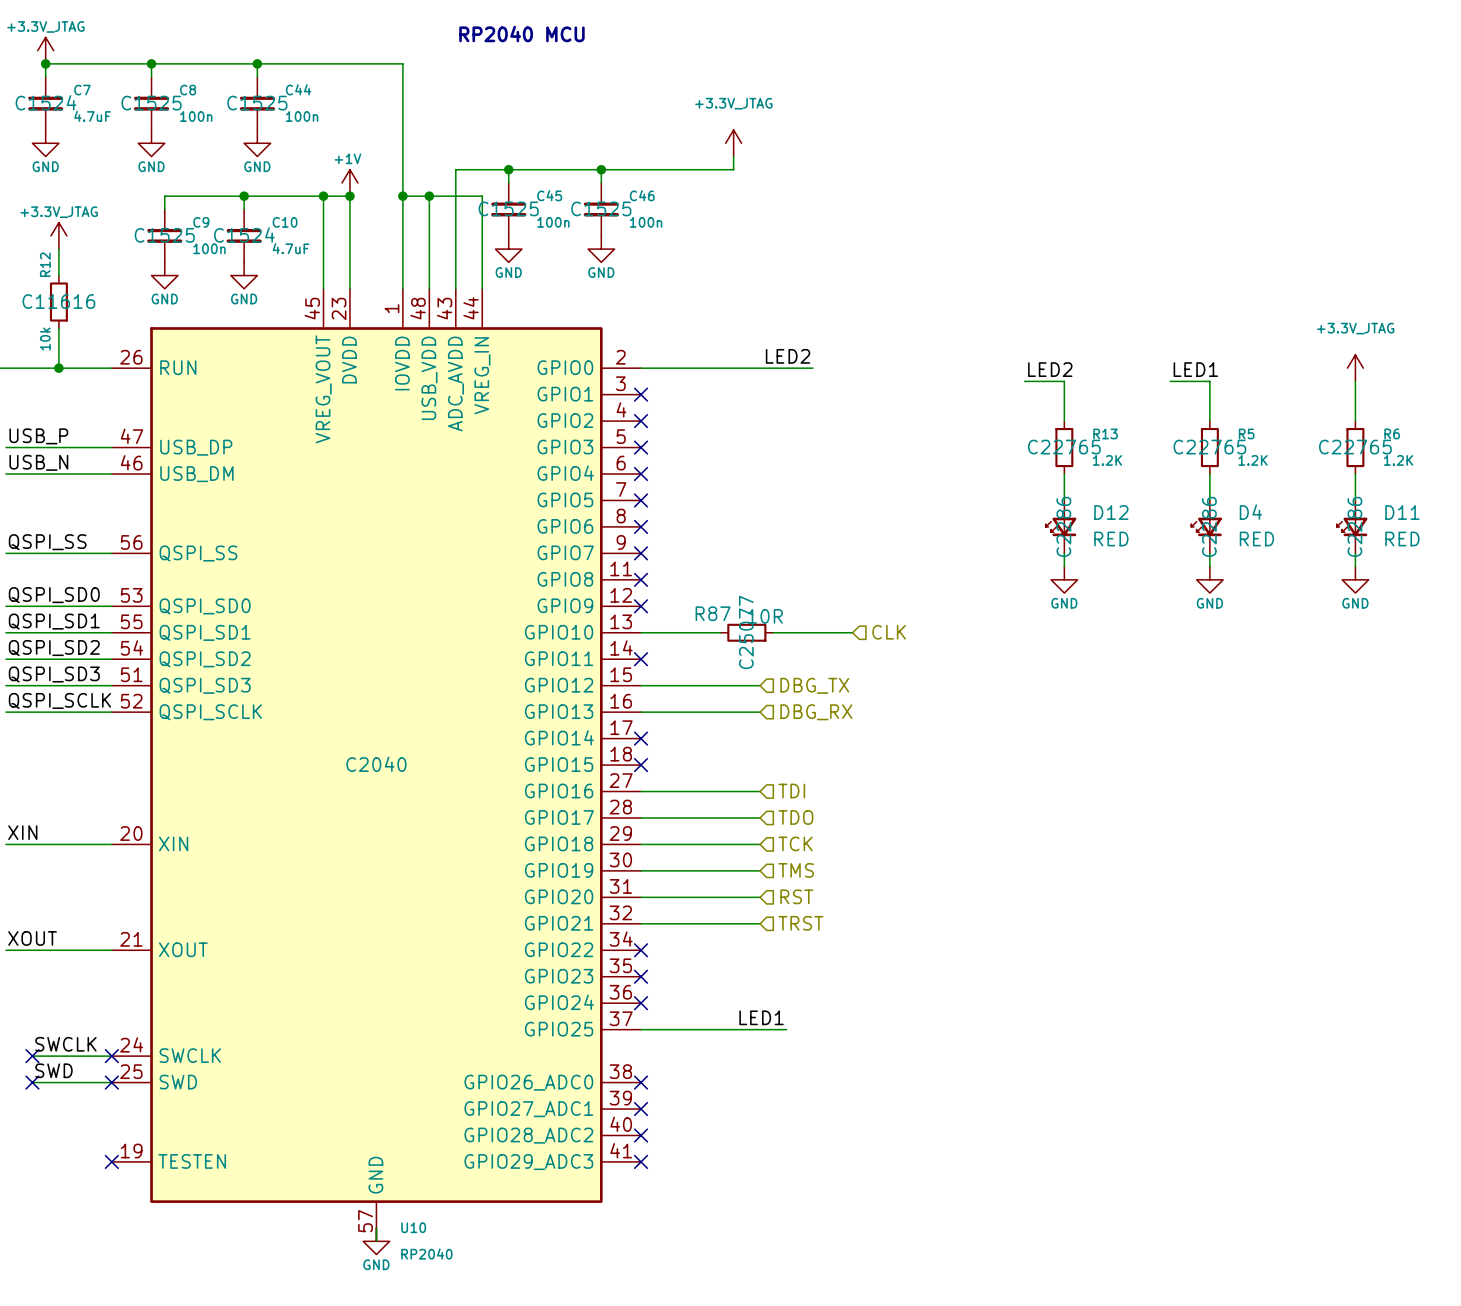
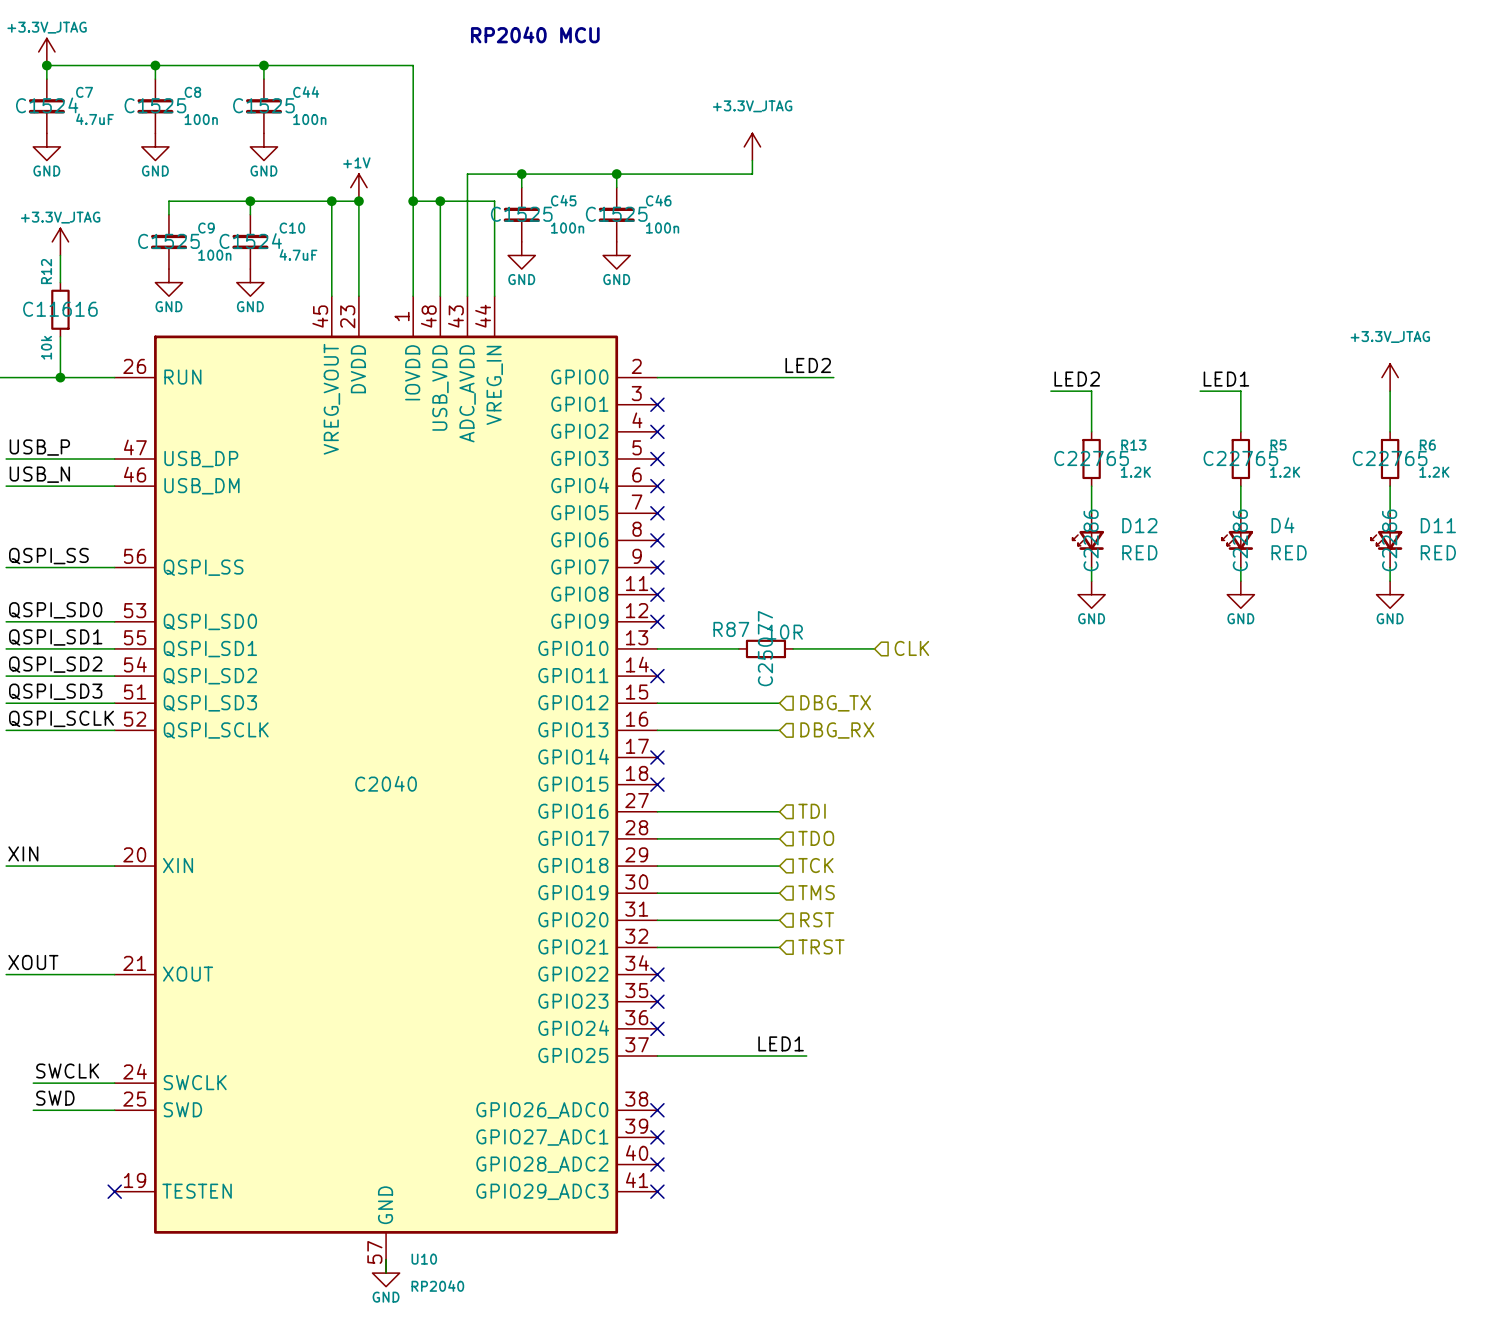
no-connect mark: (32, 1056) -> none
no-connect mark: (111, 1056) -> none
no-connect mark: (32, 1082) -> none
no-connect mark: (111, 1082) -> none

